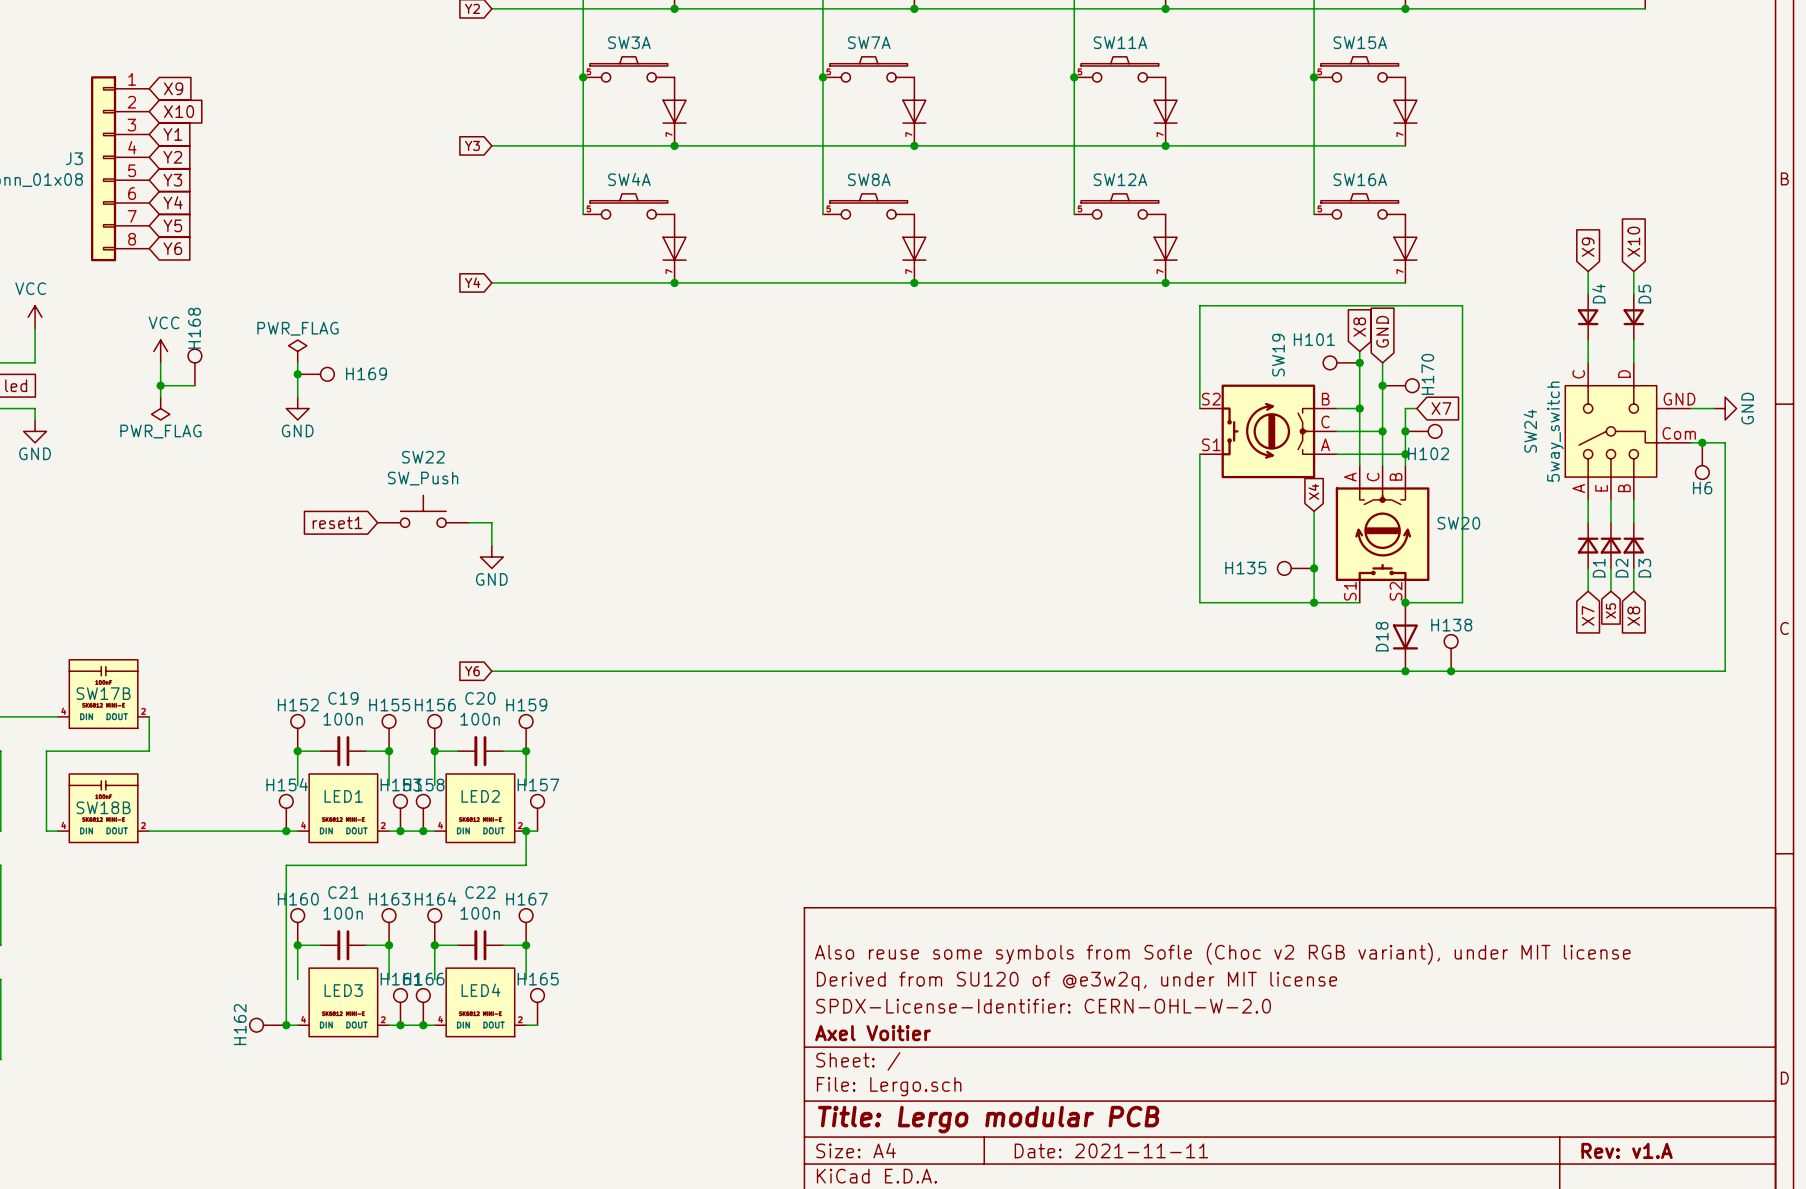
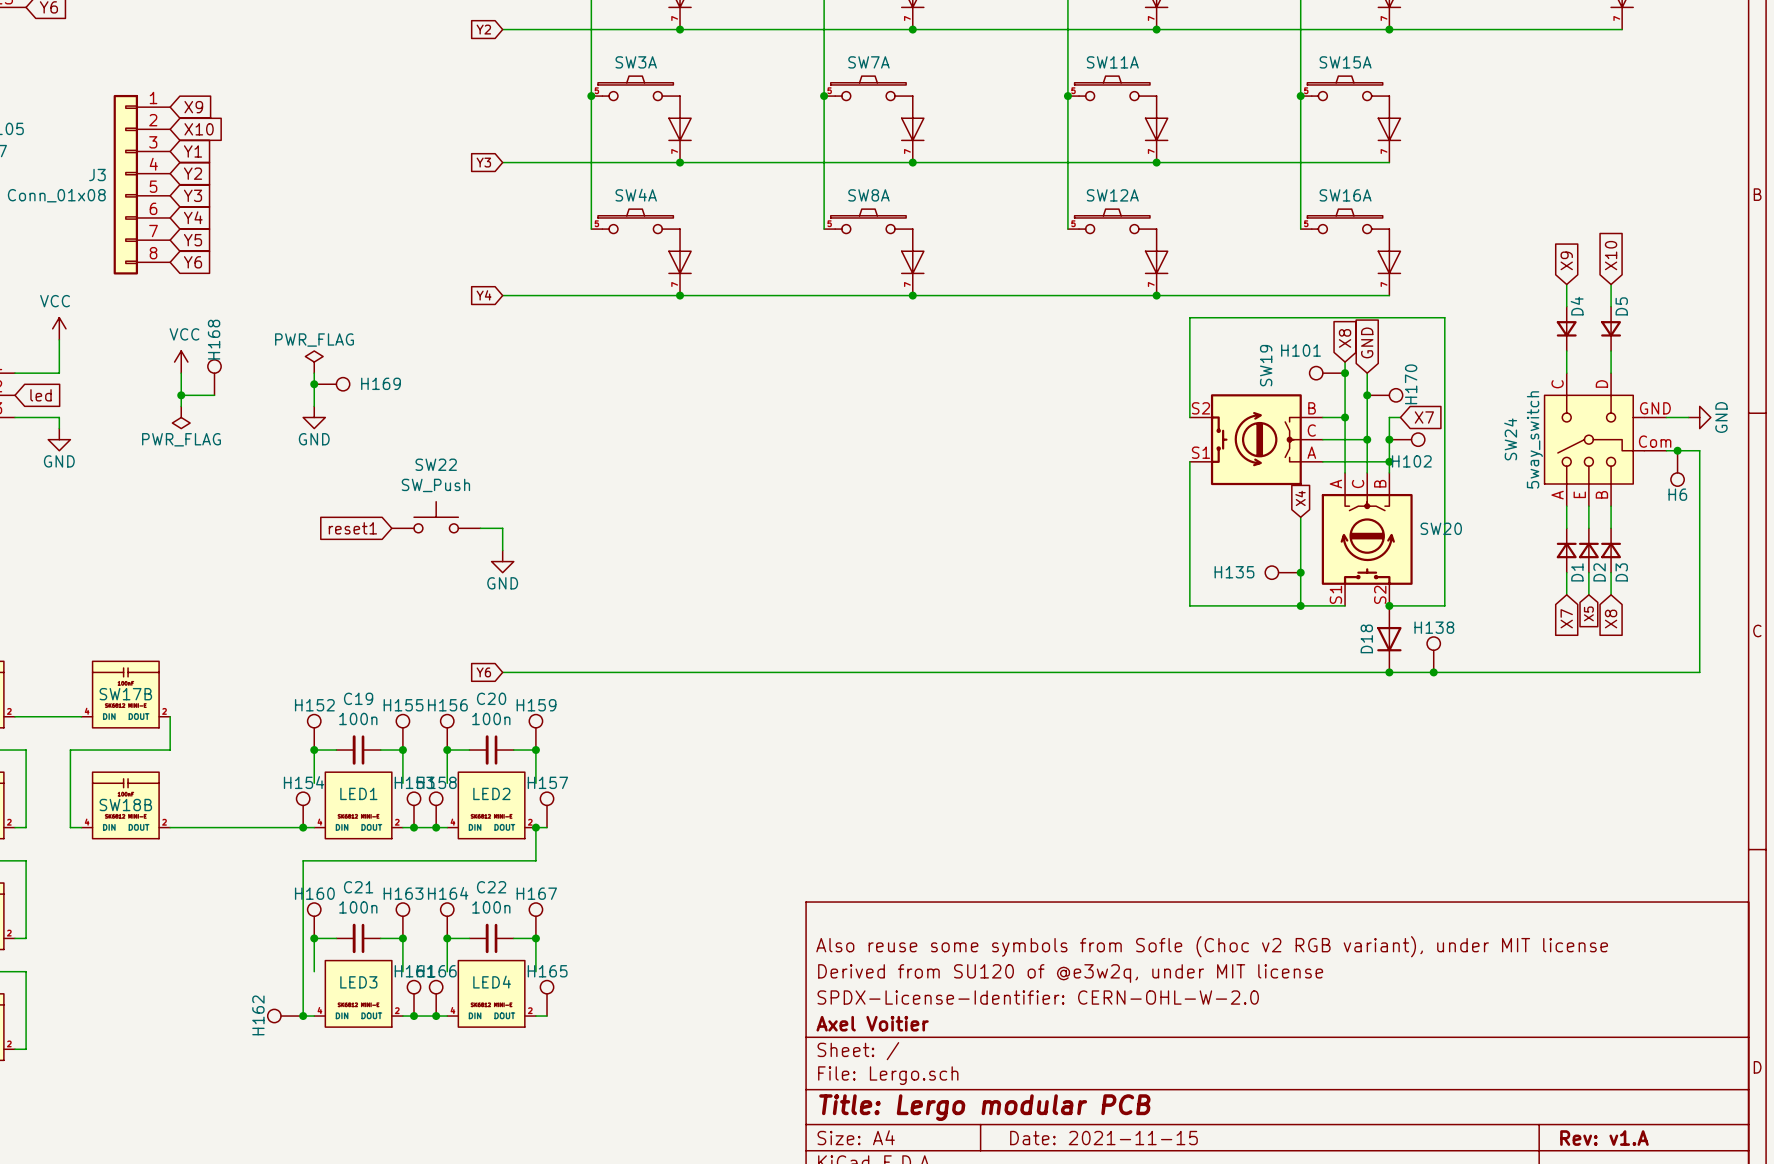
title block: Date: 2021-11-11 (1111, 1150) -> Date: 2021-11-15 (1103, 1138)

